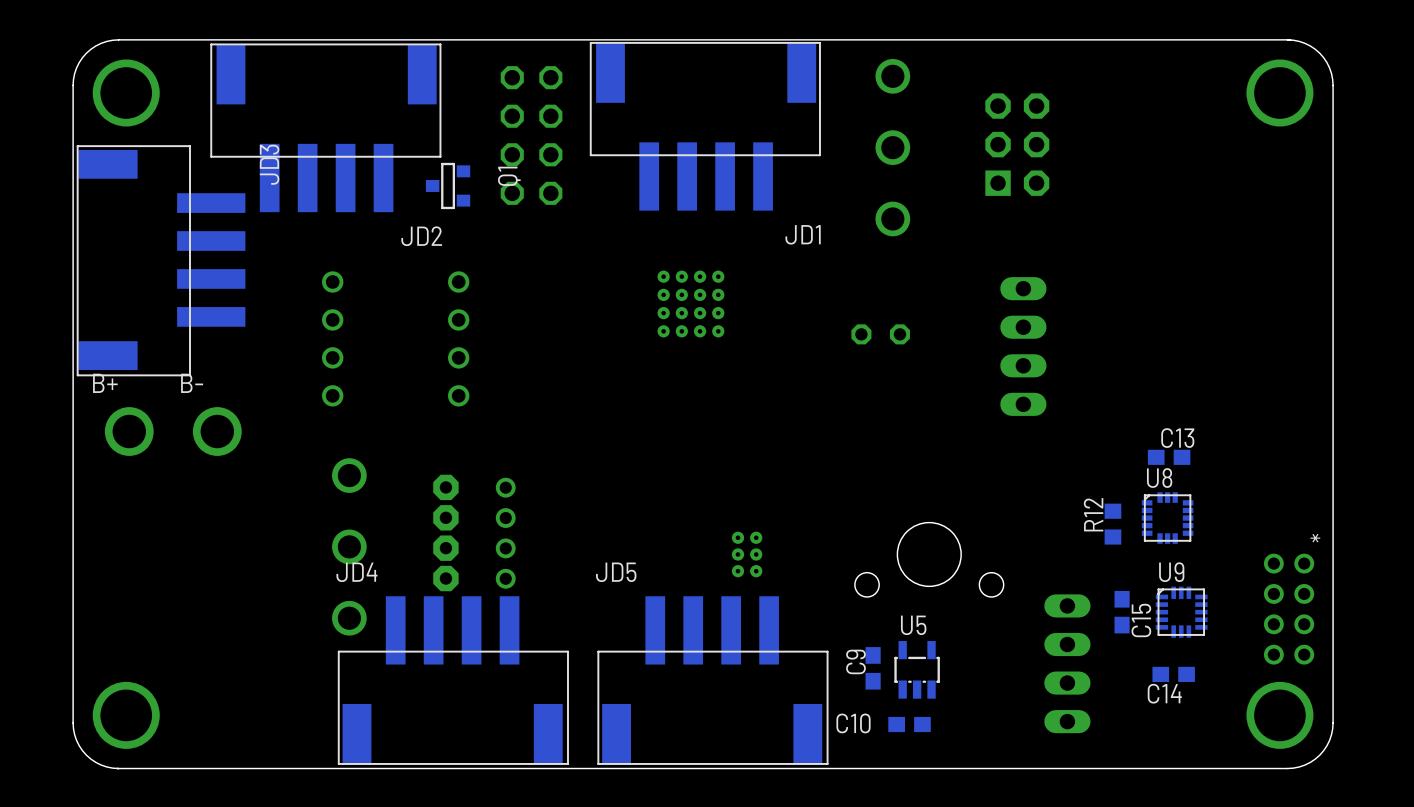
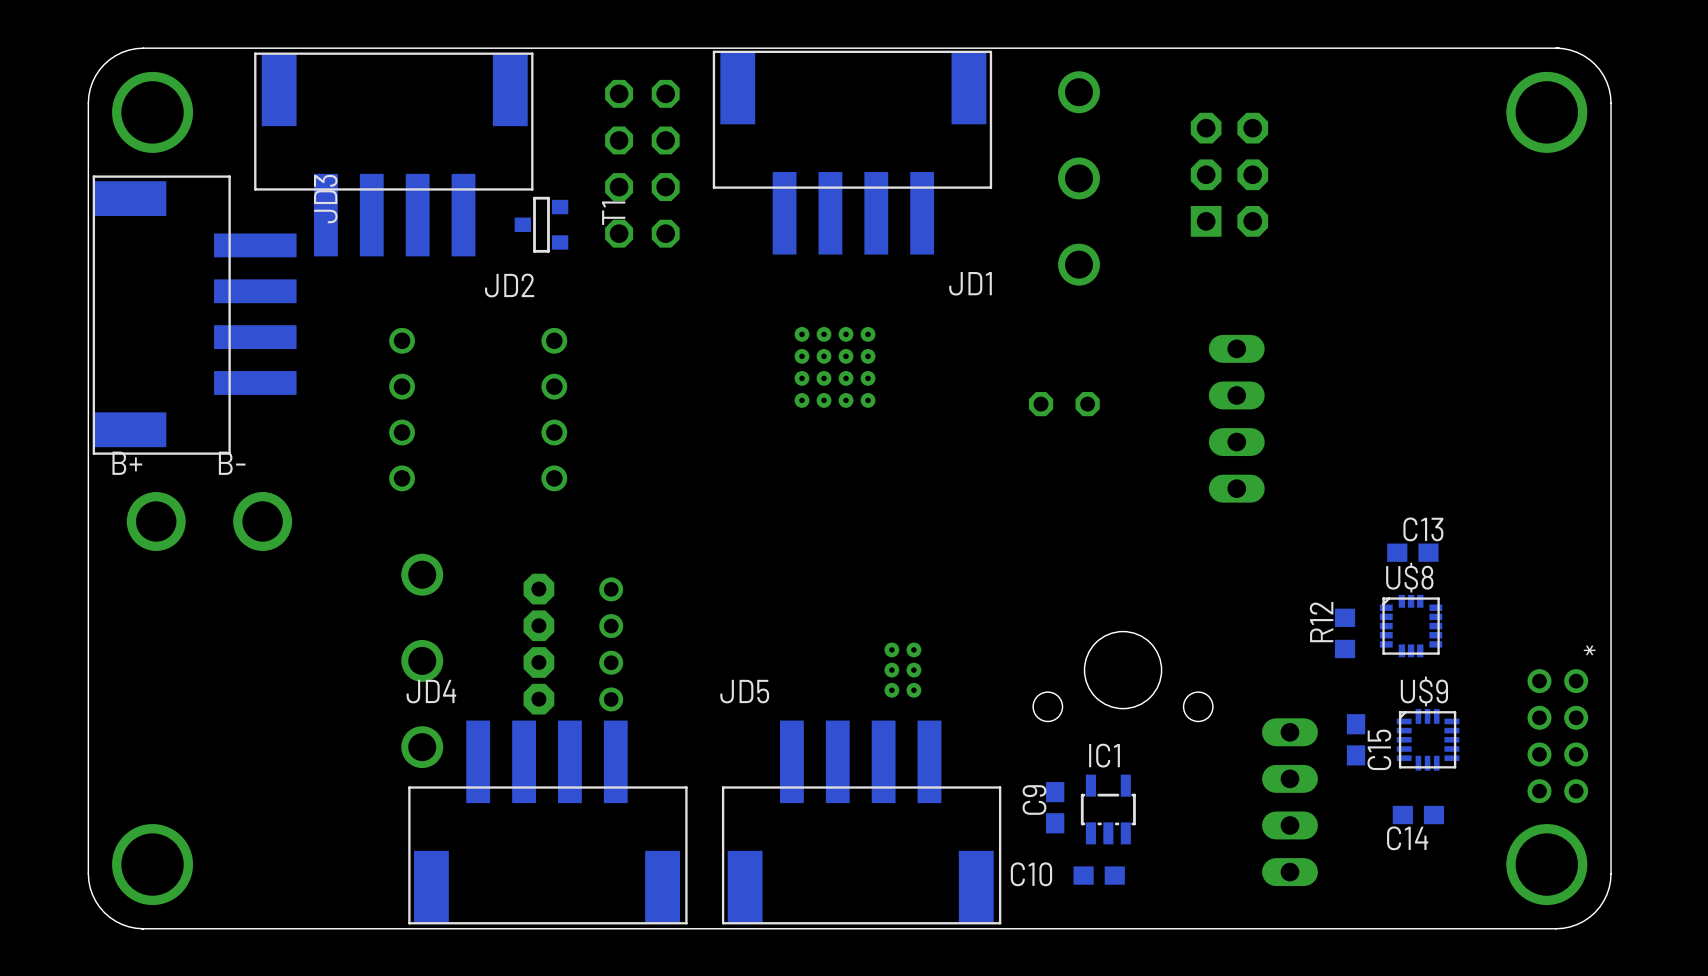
Q1 name: Q1 (509, 176) -> T1 (613, 213)
U8 name: U8 (1159, 478) -> U$8 (1409, 577)
U9 name: U9 (1171, 572) -> U$9 (1424, 691)
U5 name: U5 (913, 625) -> IC1 (1104, 755)

